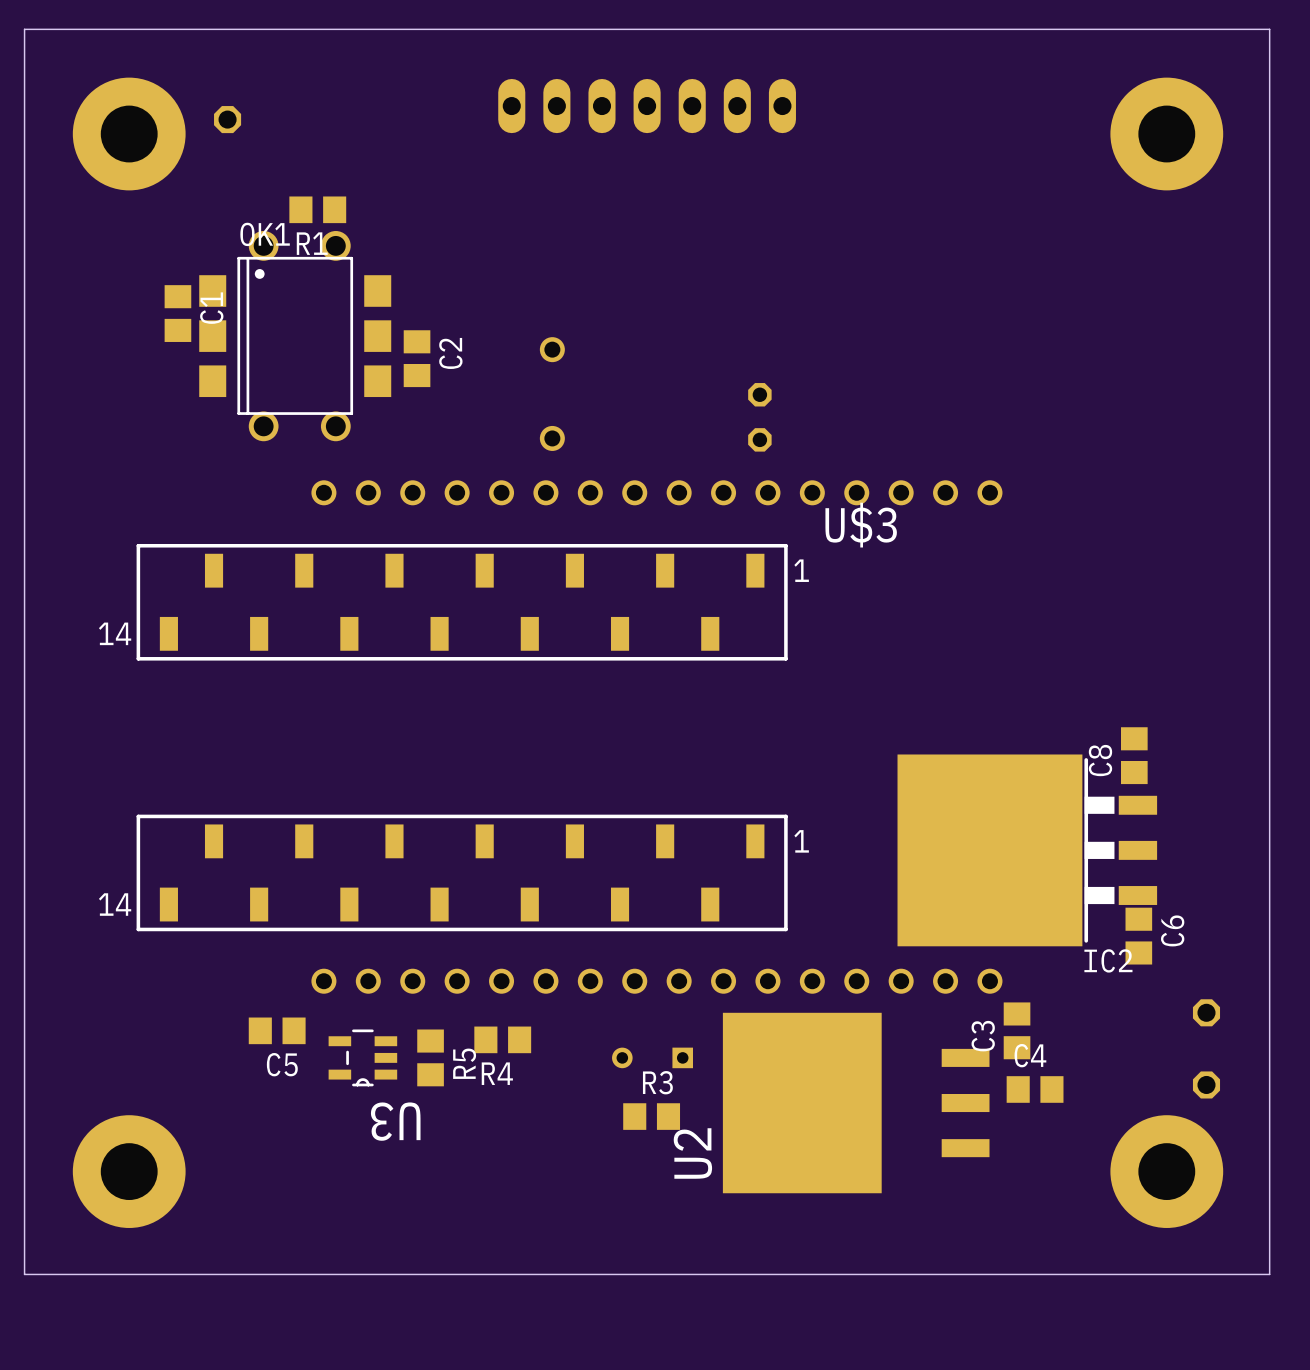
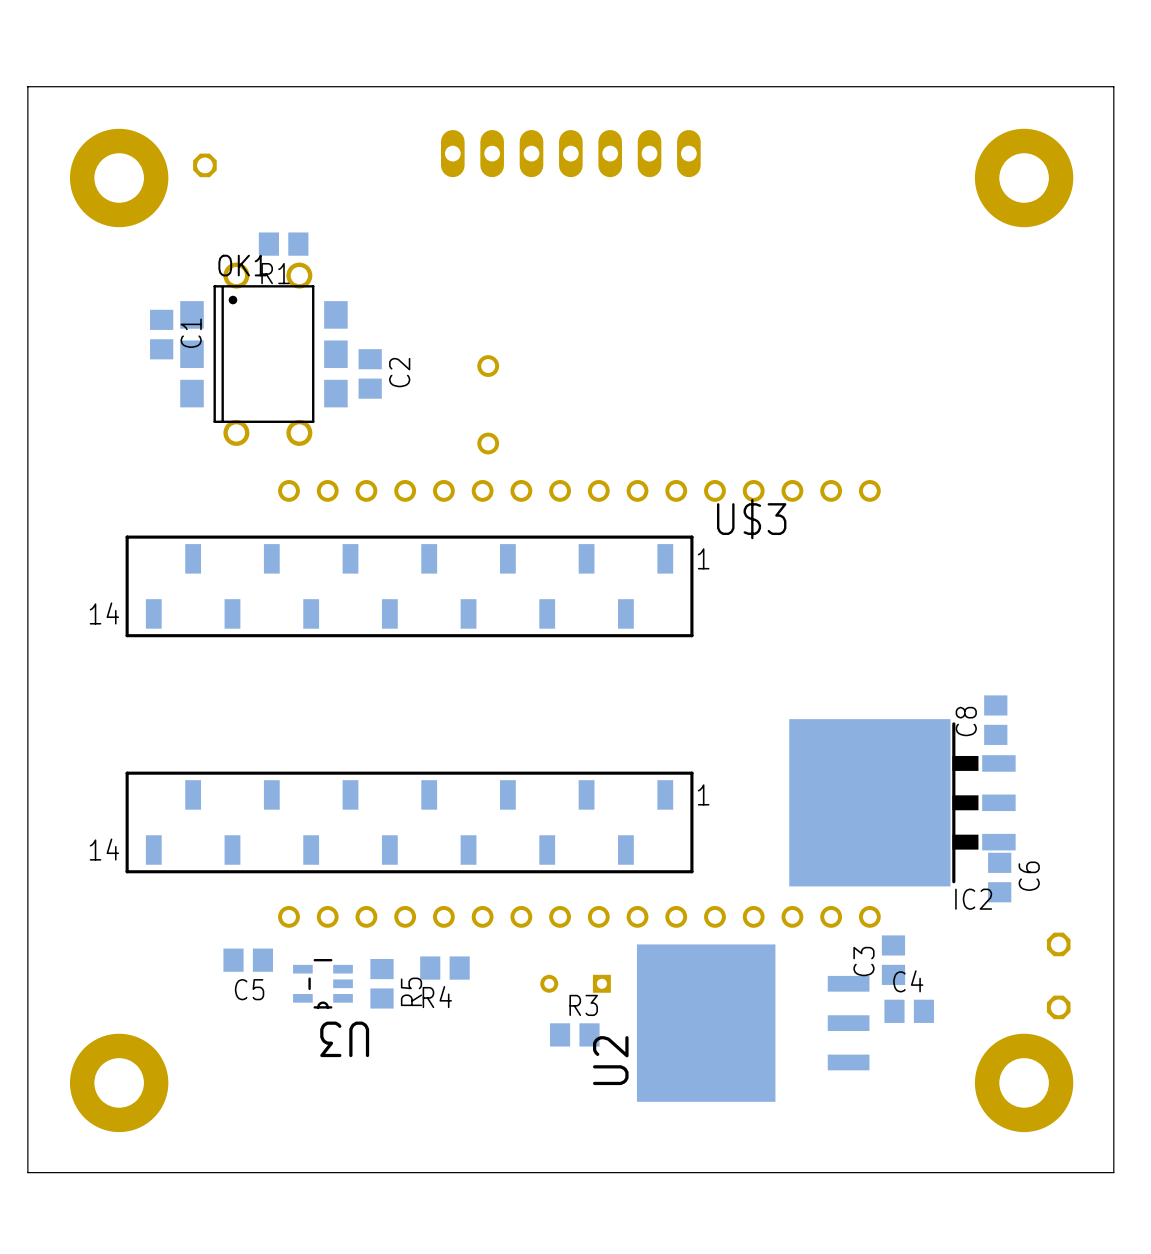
part: (759, 417) -> none

